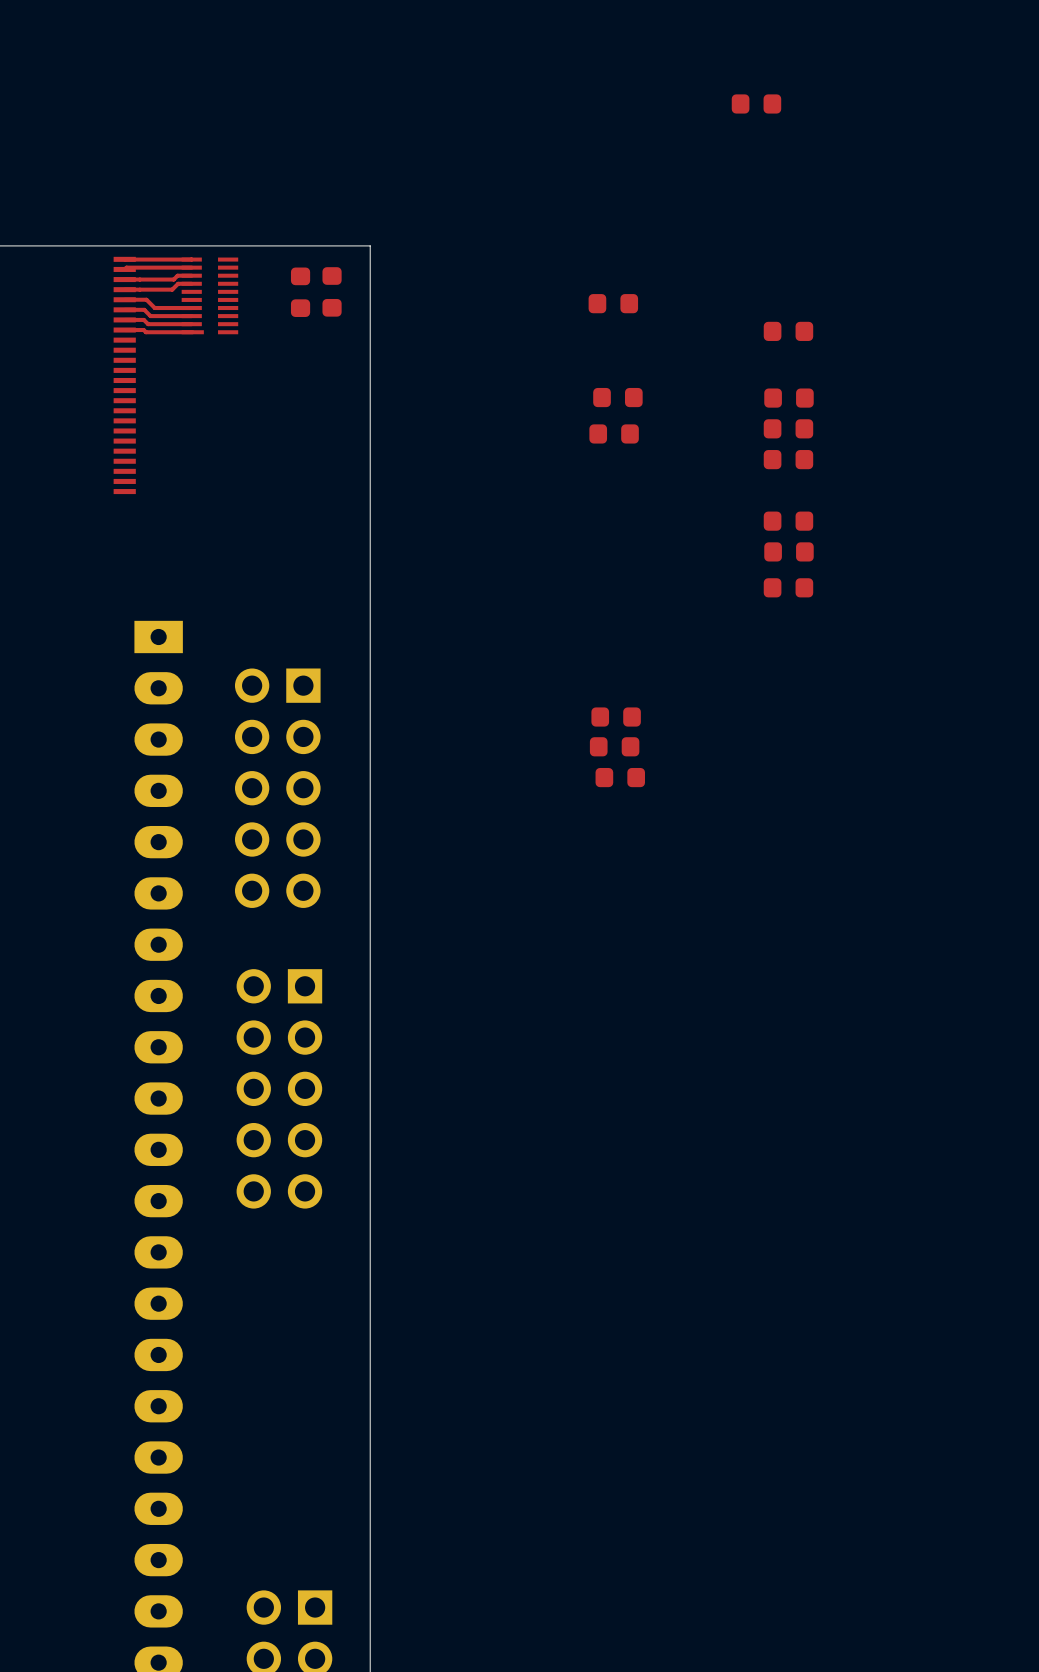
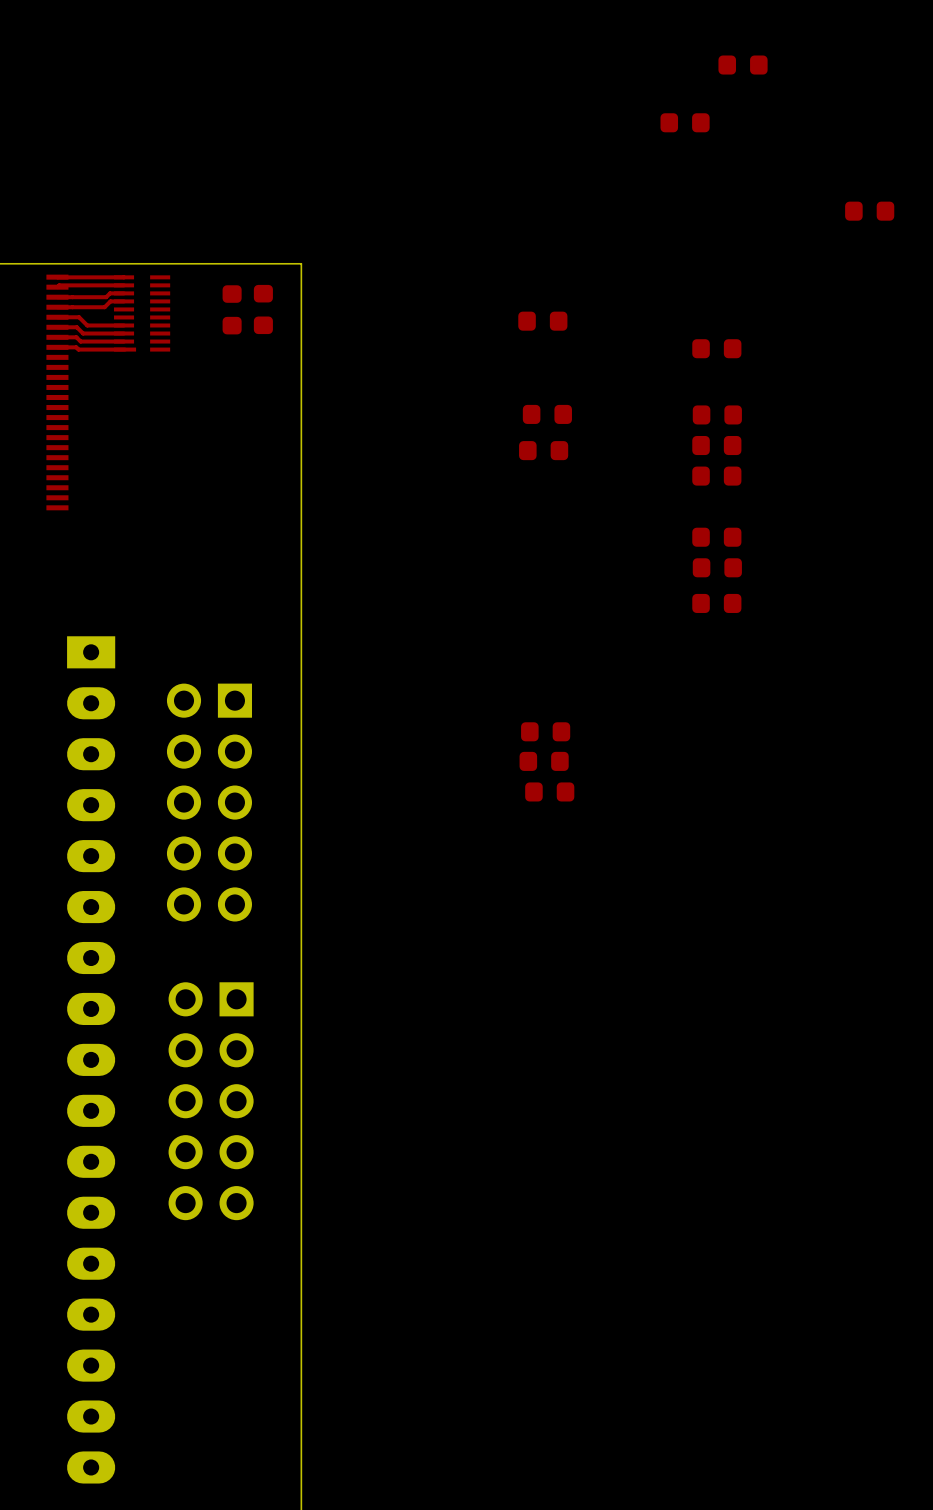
part: none -> (743, 65)
part: none -> (869, 211)

